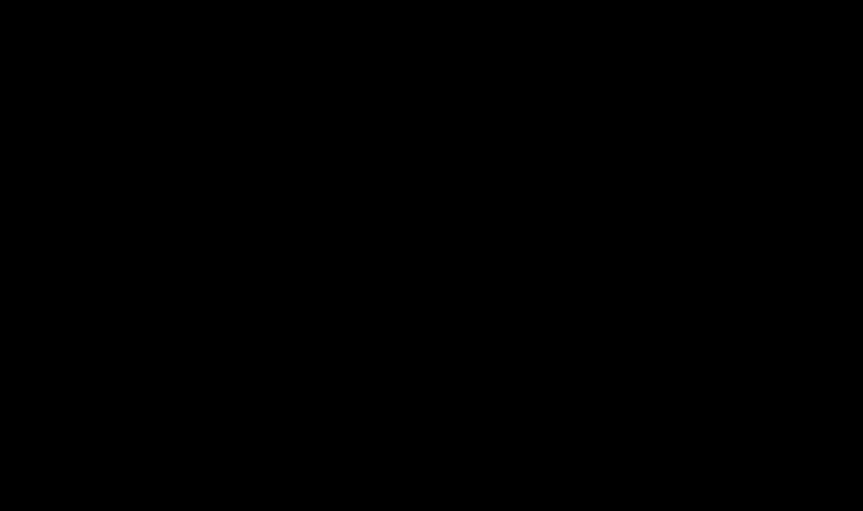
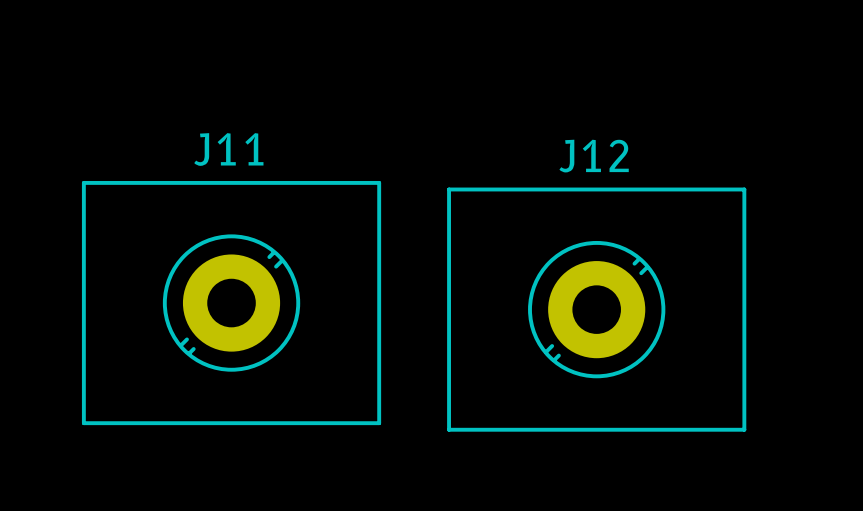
J11: none -> (231, 303)
J12: none -> (596, 309)

